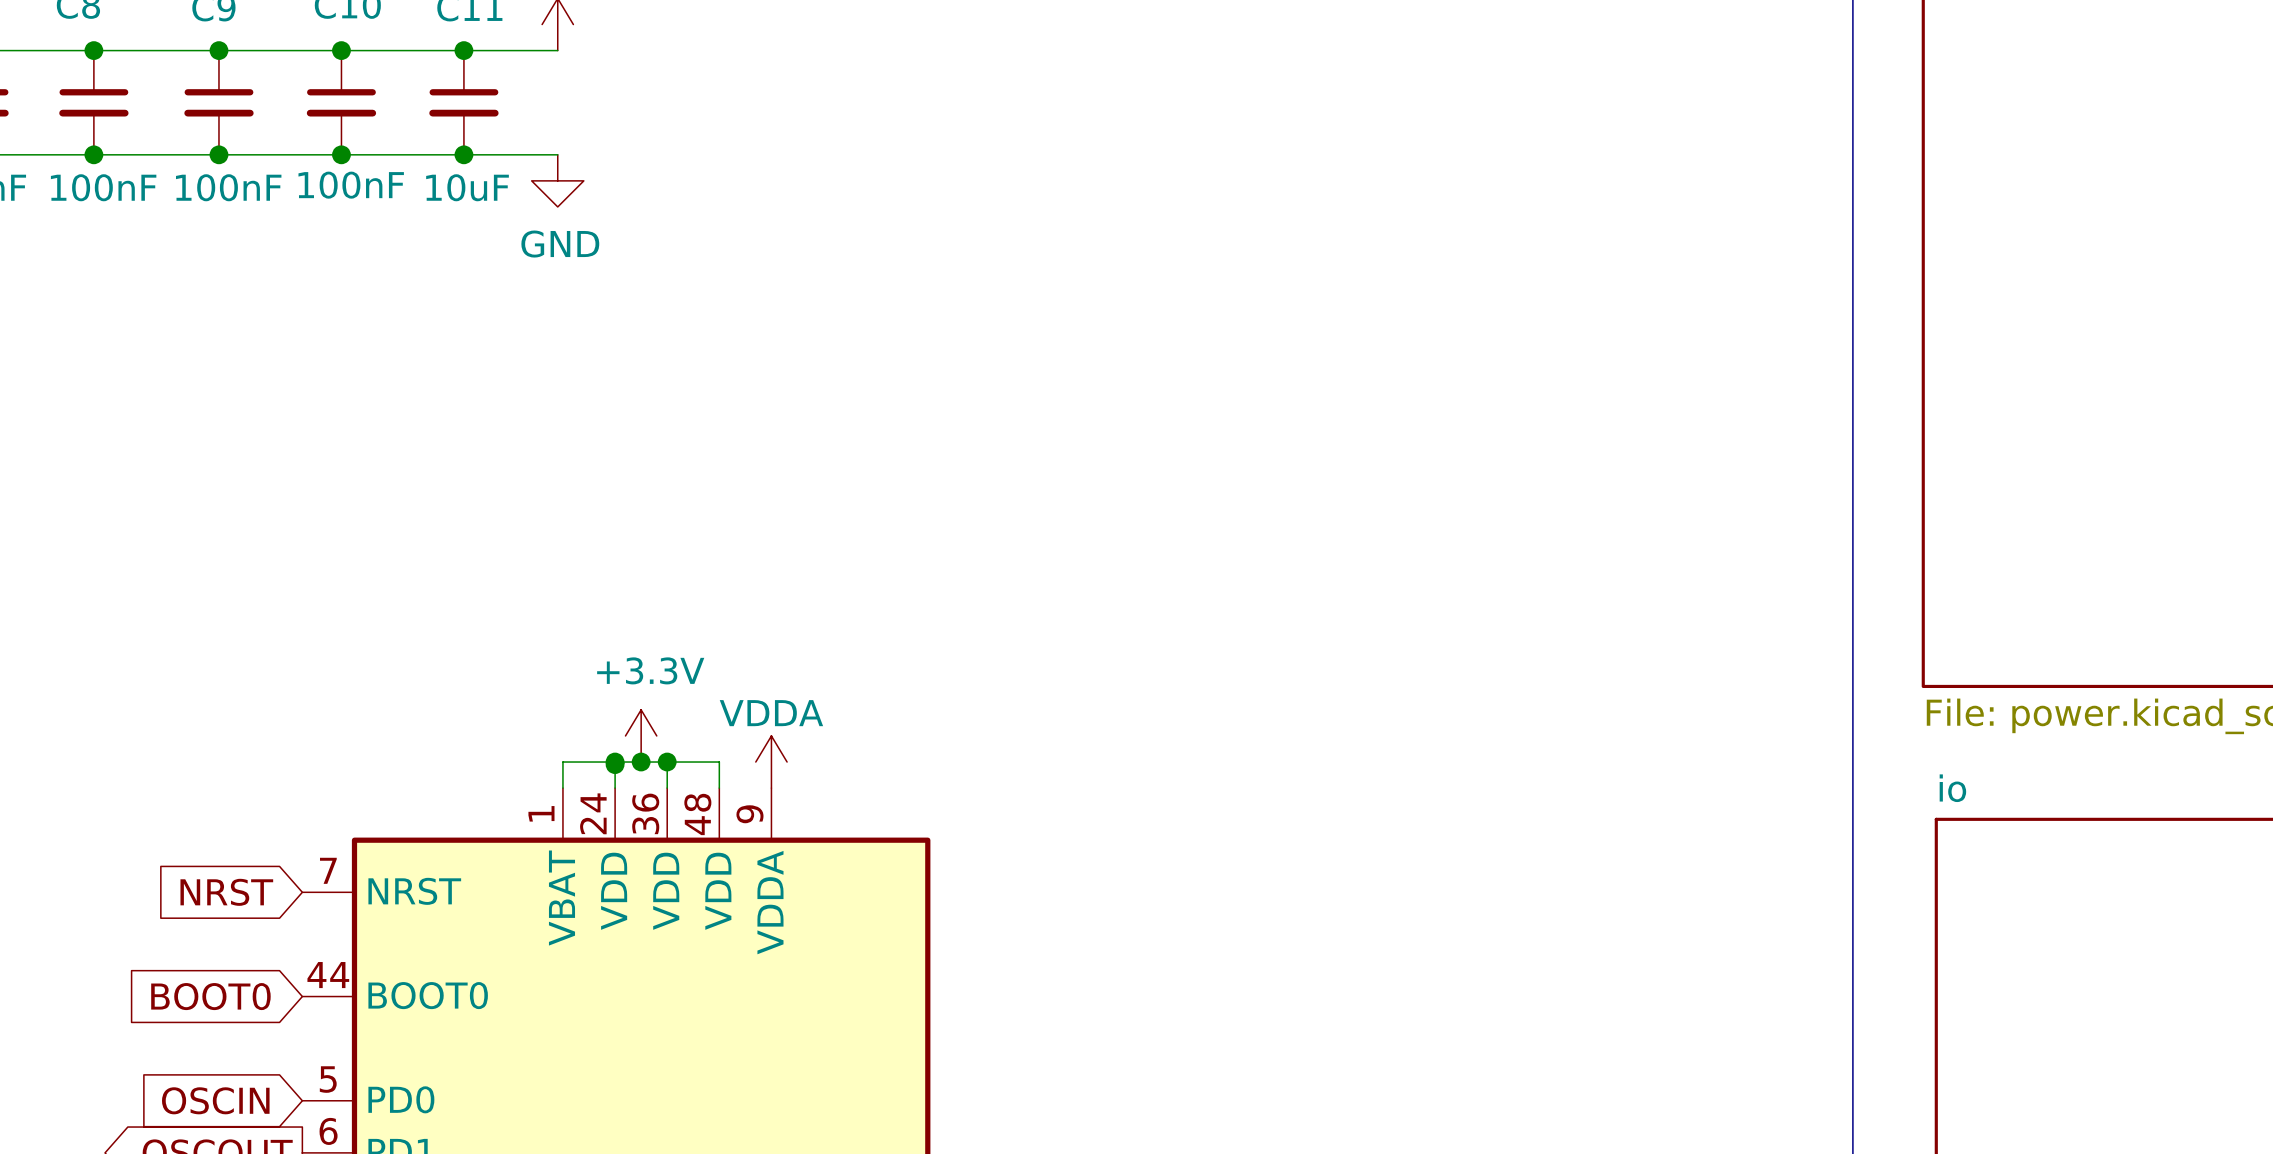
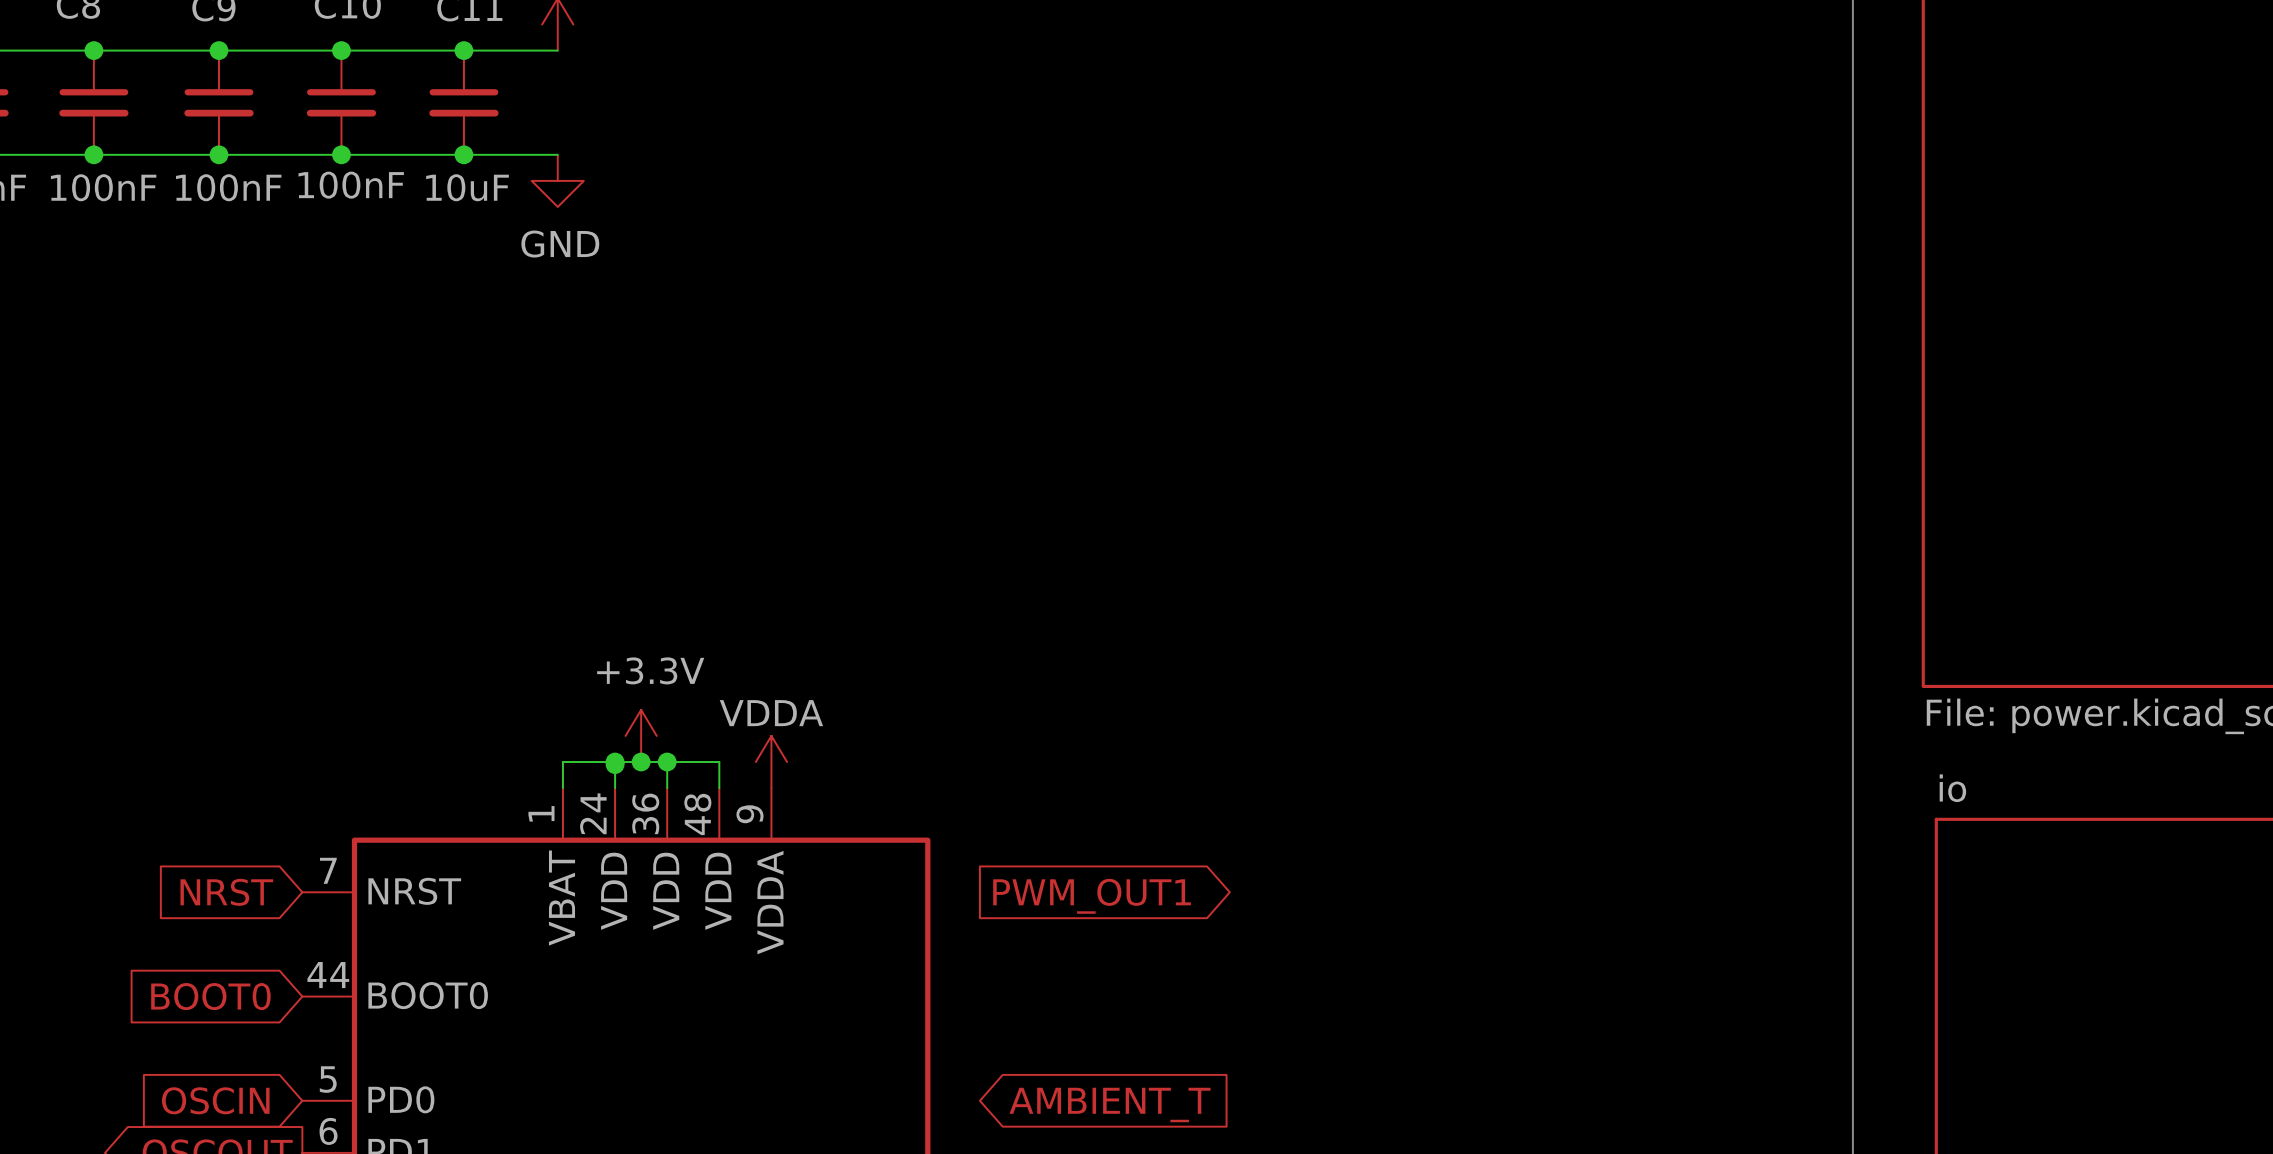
global label: none -> PWM_OUT1 (1092, 896)
global label: none -> AMBIENT_T (1110, 1105)

